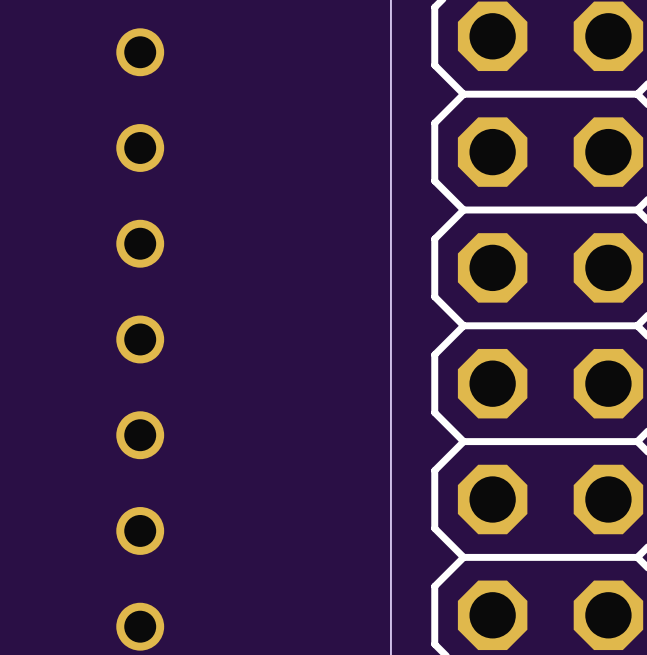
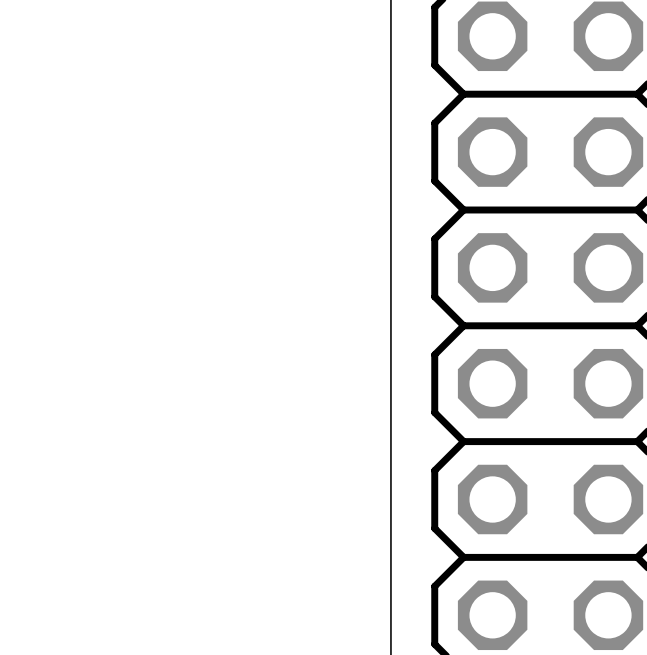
part: (140, 52) -> none
part: (140, 147) -> none
part: (140, 243) -> none
part: (140, 339) -> none
part: (140, 435) -> none
part: (140, 530) -> none
part: (140, 626) -> none

